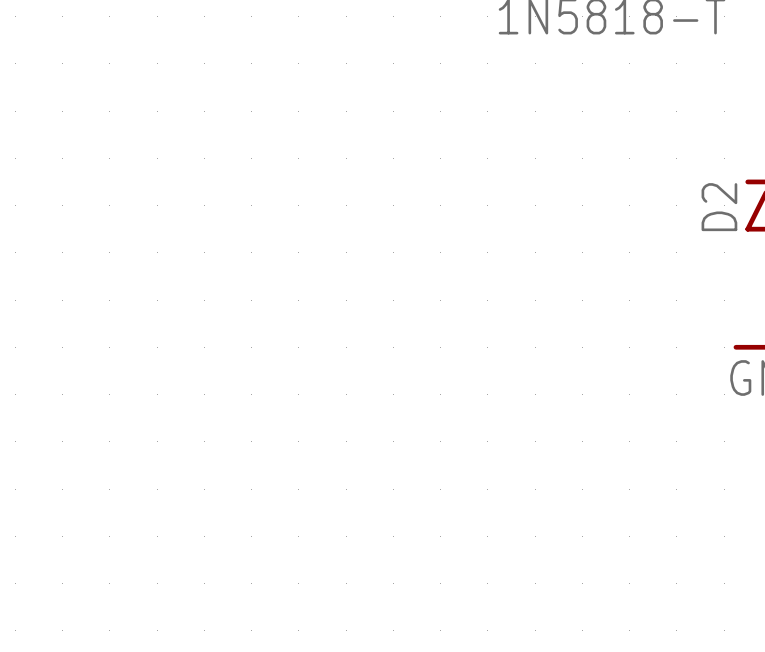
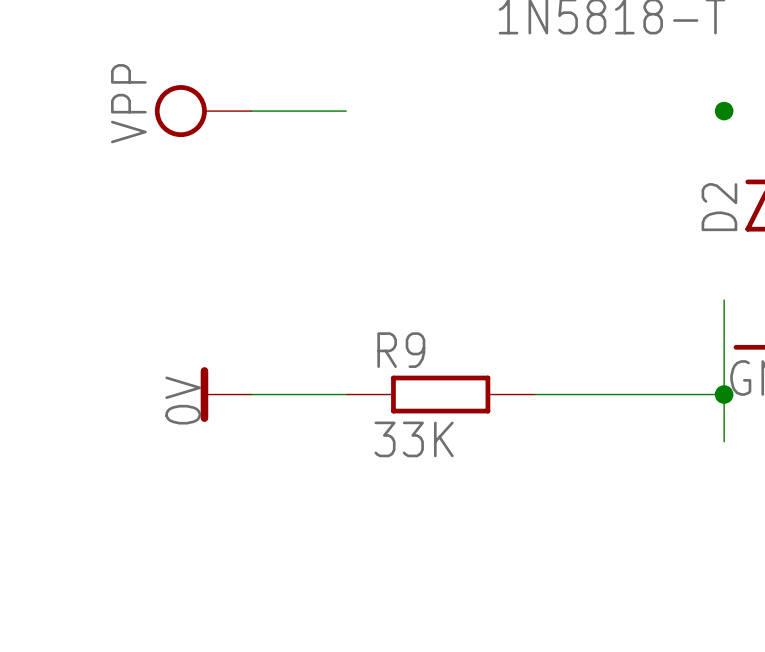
power symbol: none -> VPP (203, 111)
wire: none -> (251, 111) (346, 111)
junction: none -> (724, 111)
wire: none -> (724, 300) (724, 441)
power symbol: none -> 0V (226, 394)
wire: none -> (251, 394) (346, 394)
R9: none -> 33K (440, 394)
wire: none -> (535, 394) (724, 394)
junction: none -> (724, 394)

